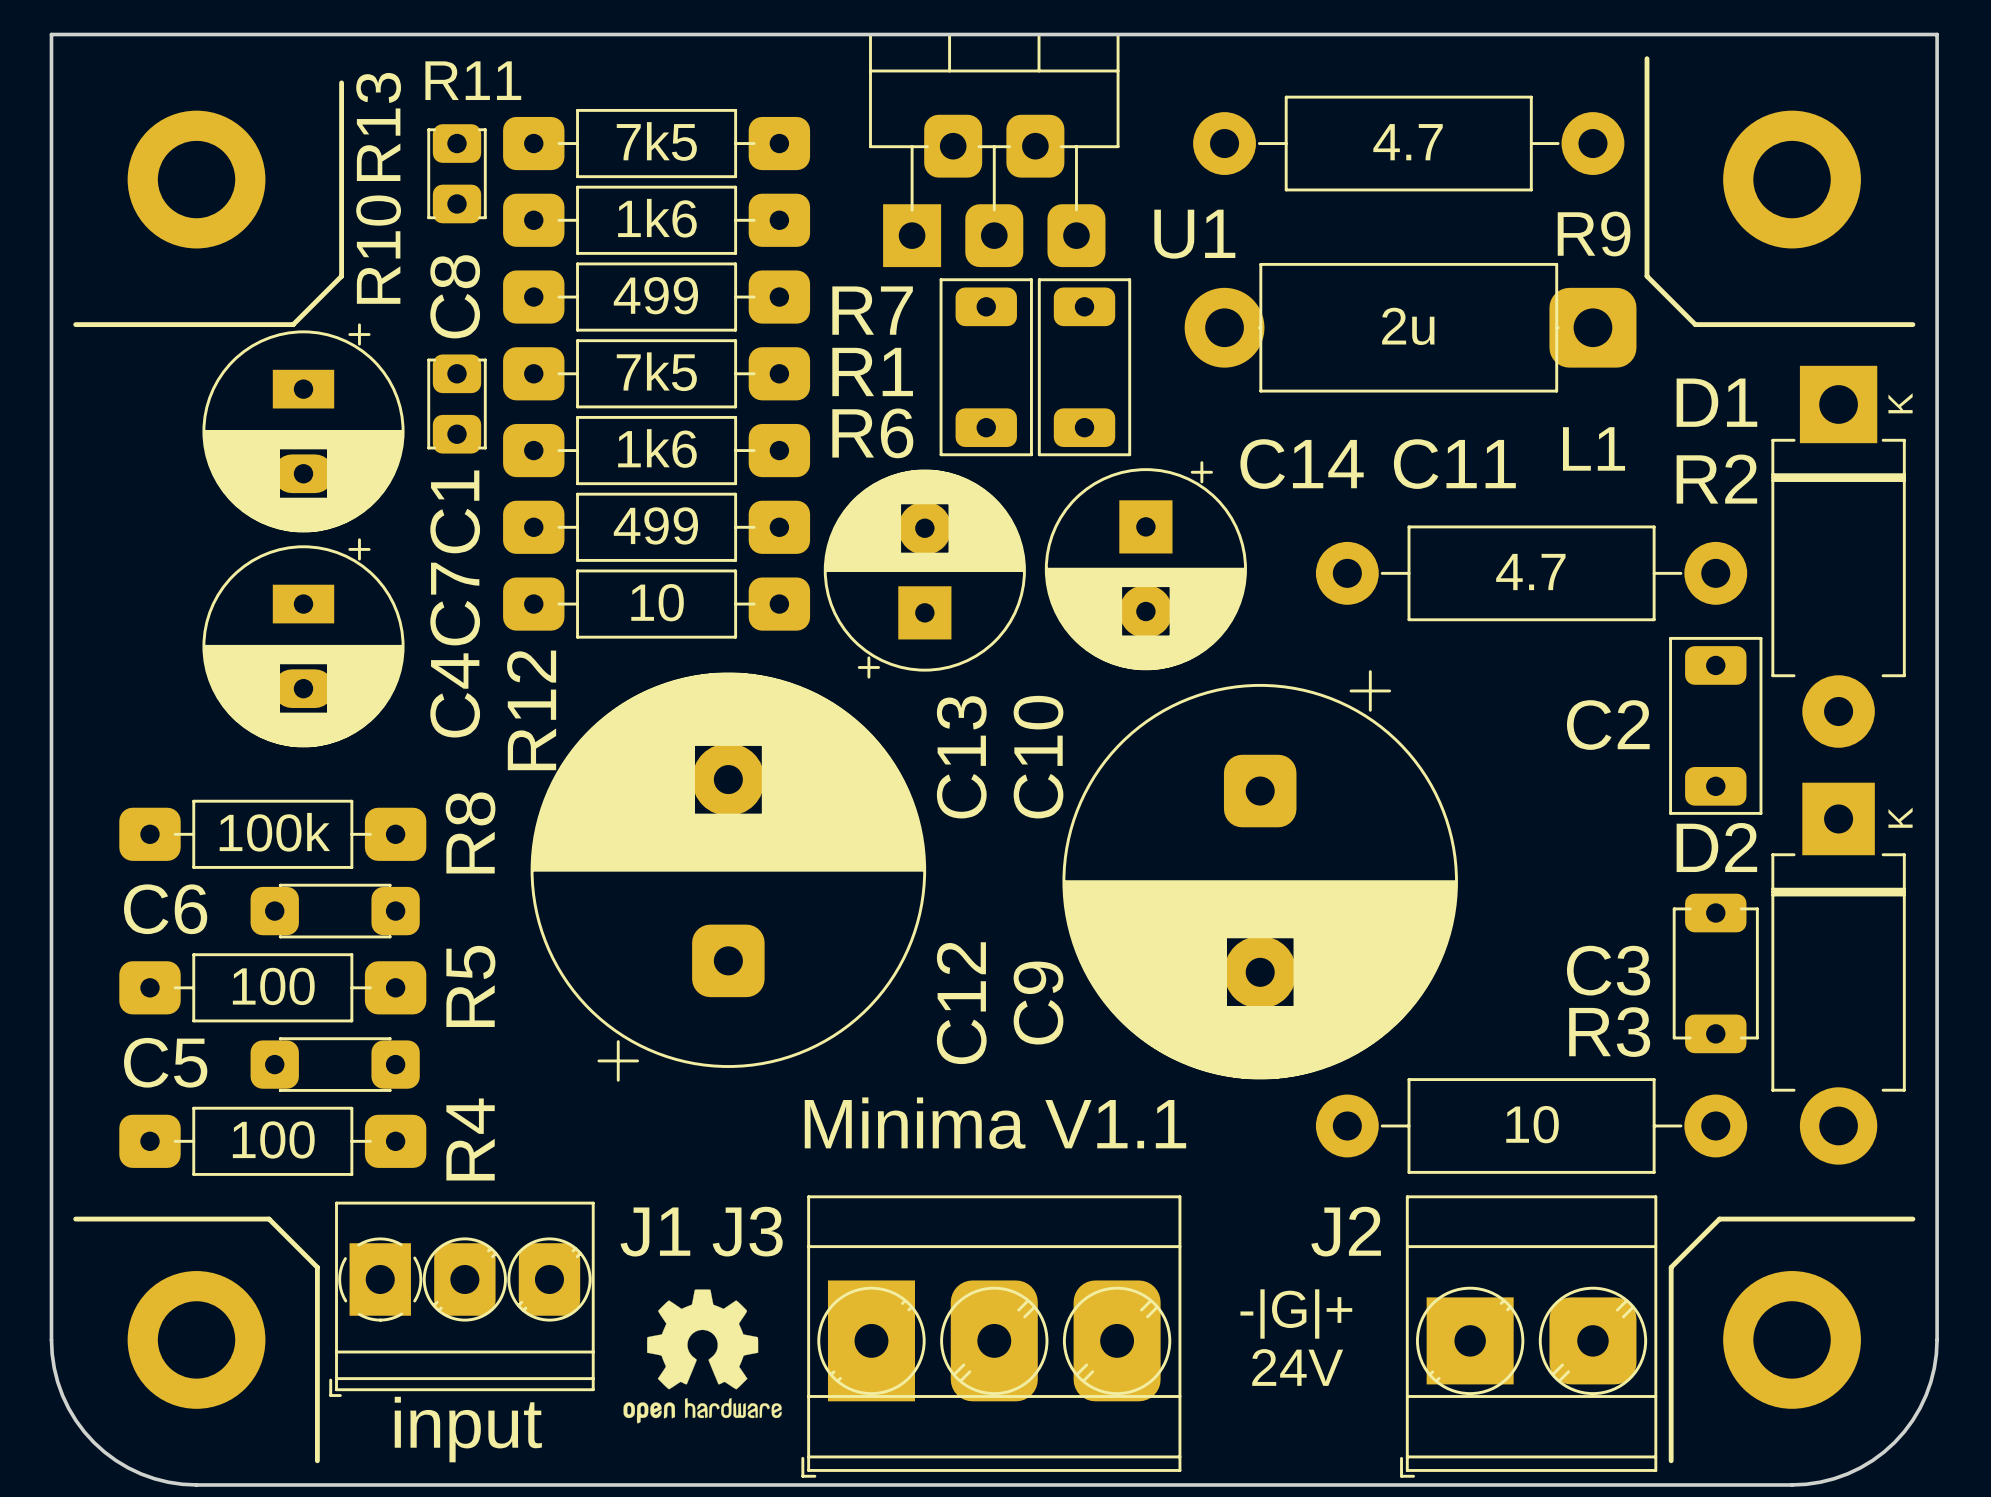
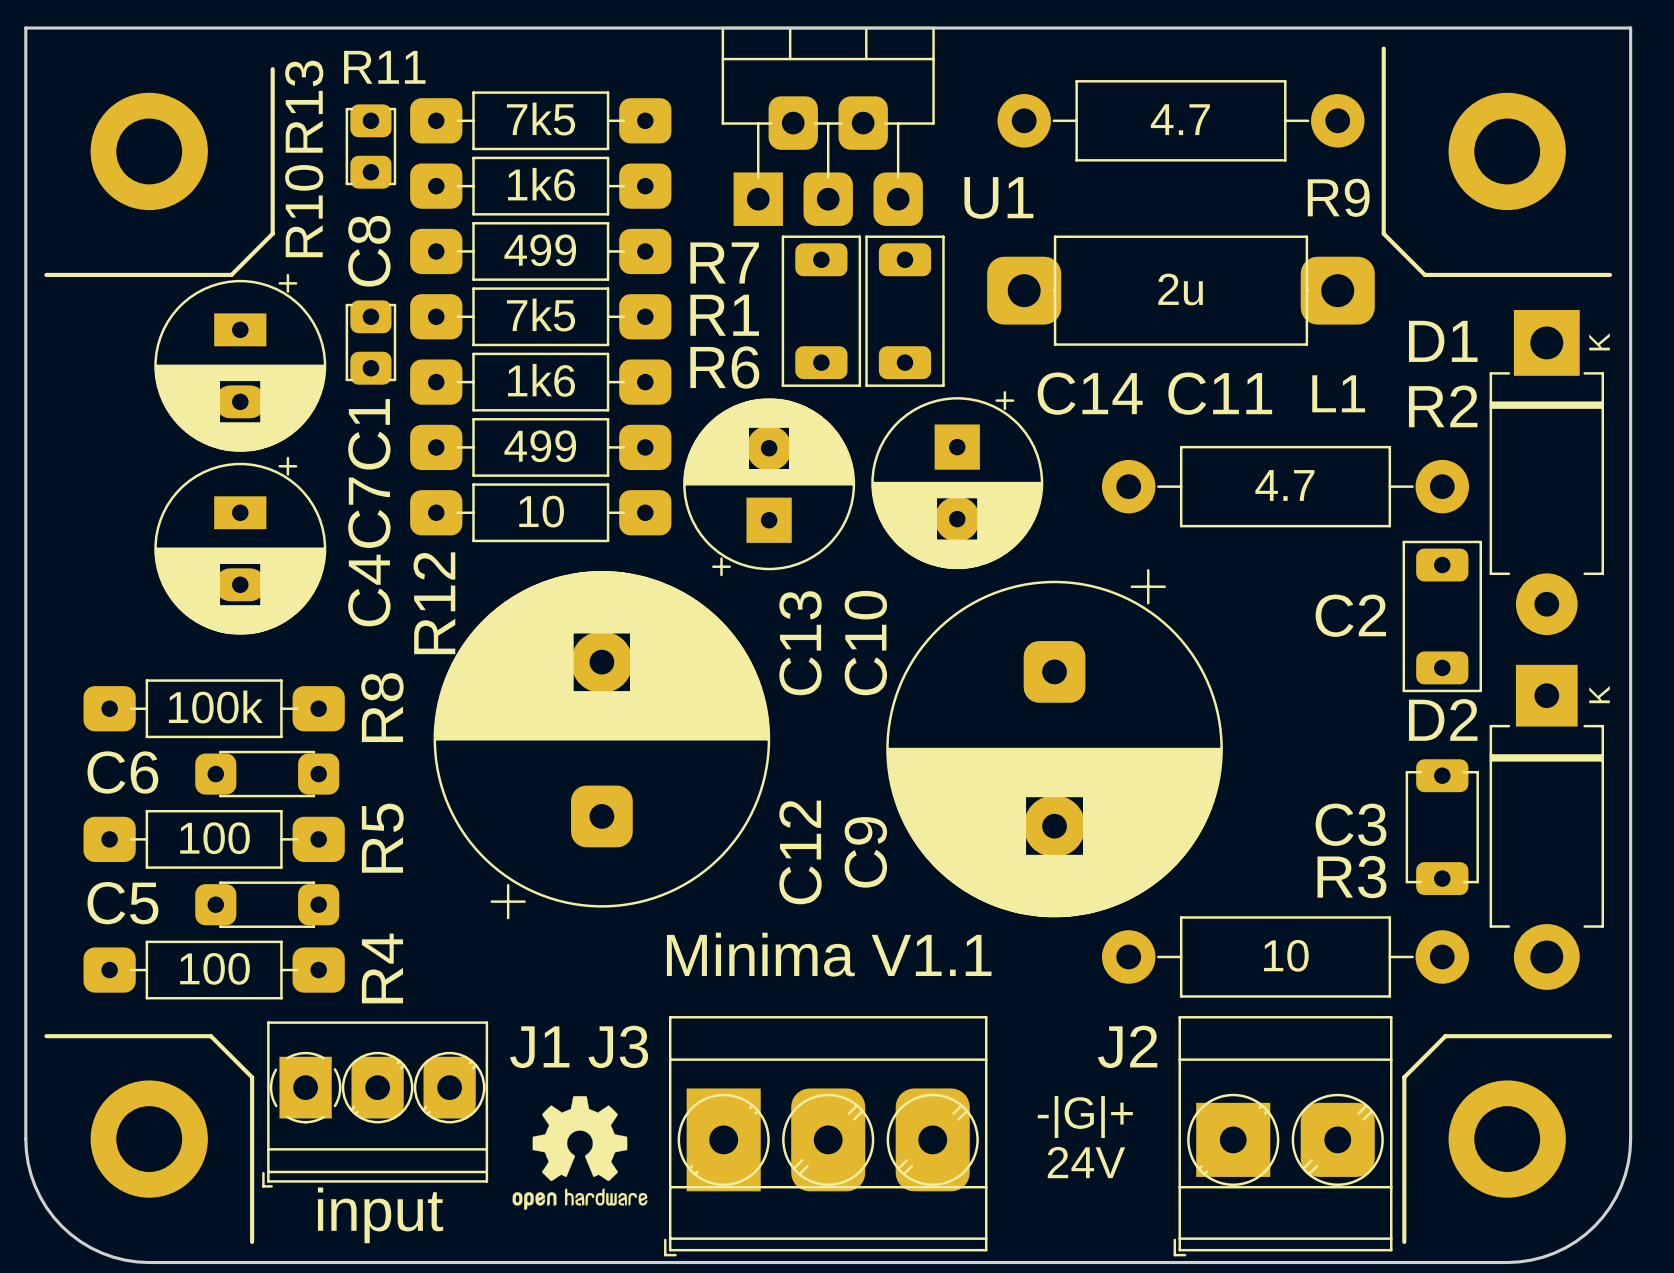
L1 footprint: [1184, 262, 1637, 393] -> [987, 235, 1375, 346]

